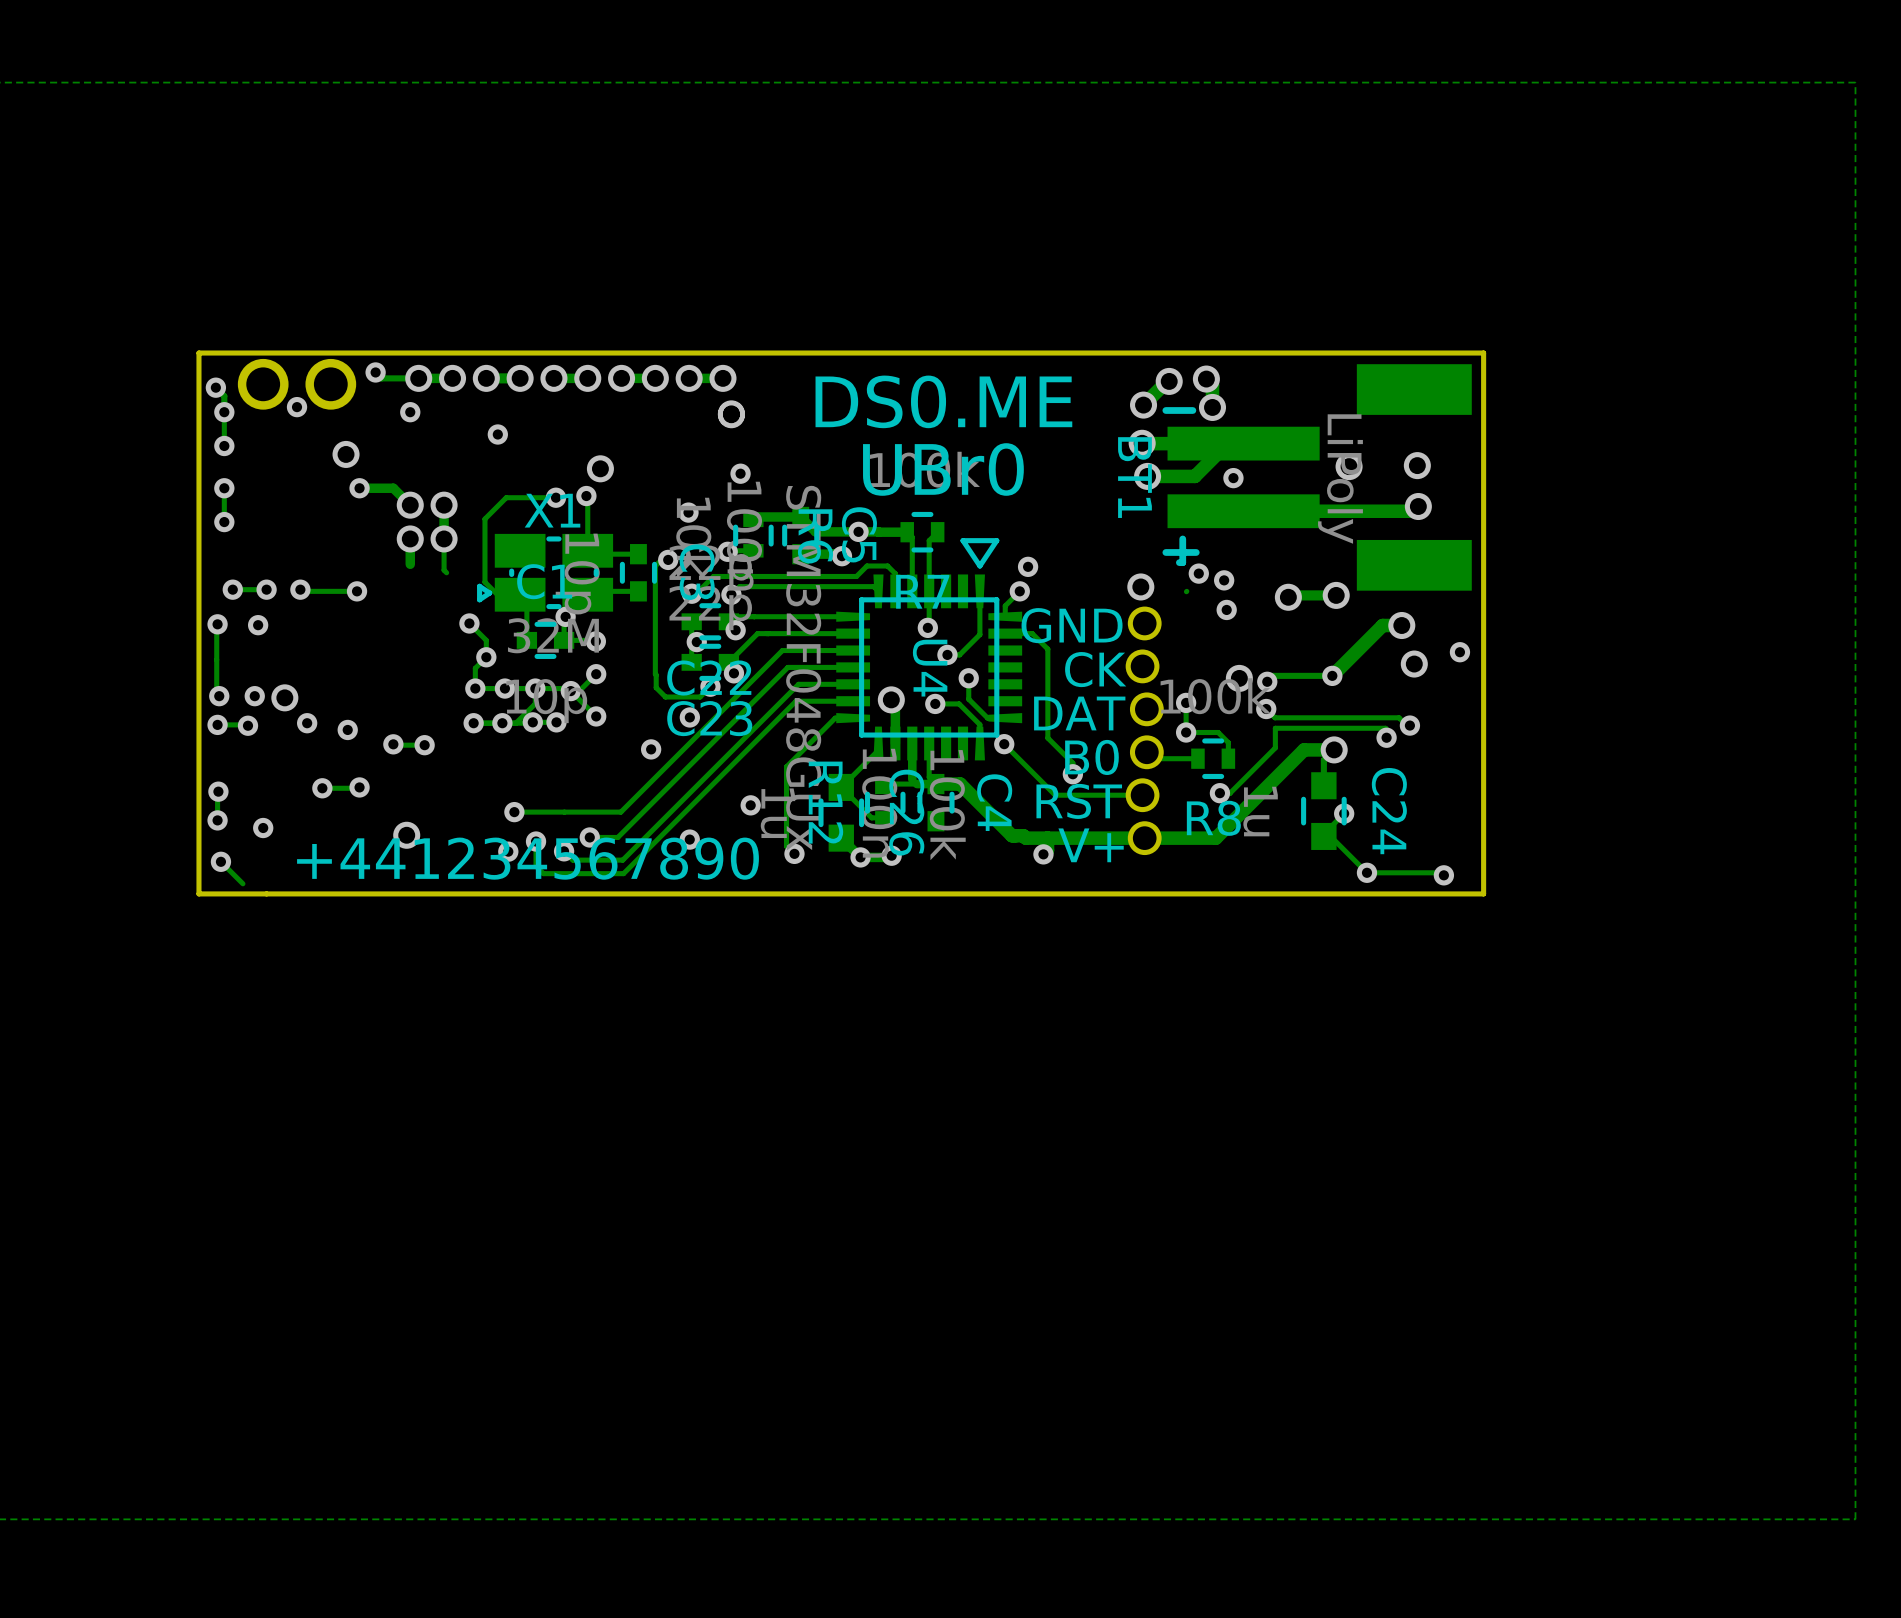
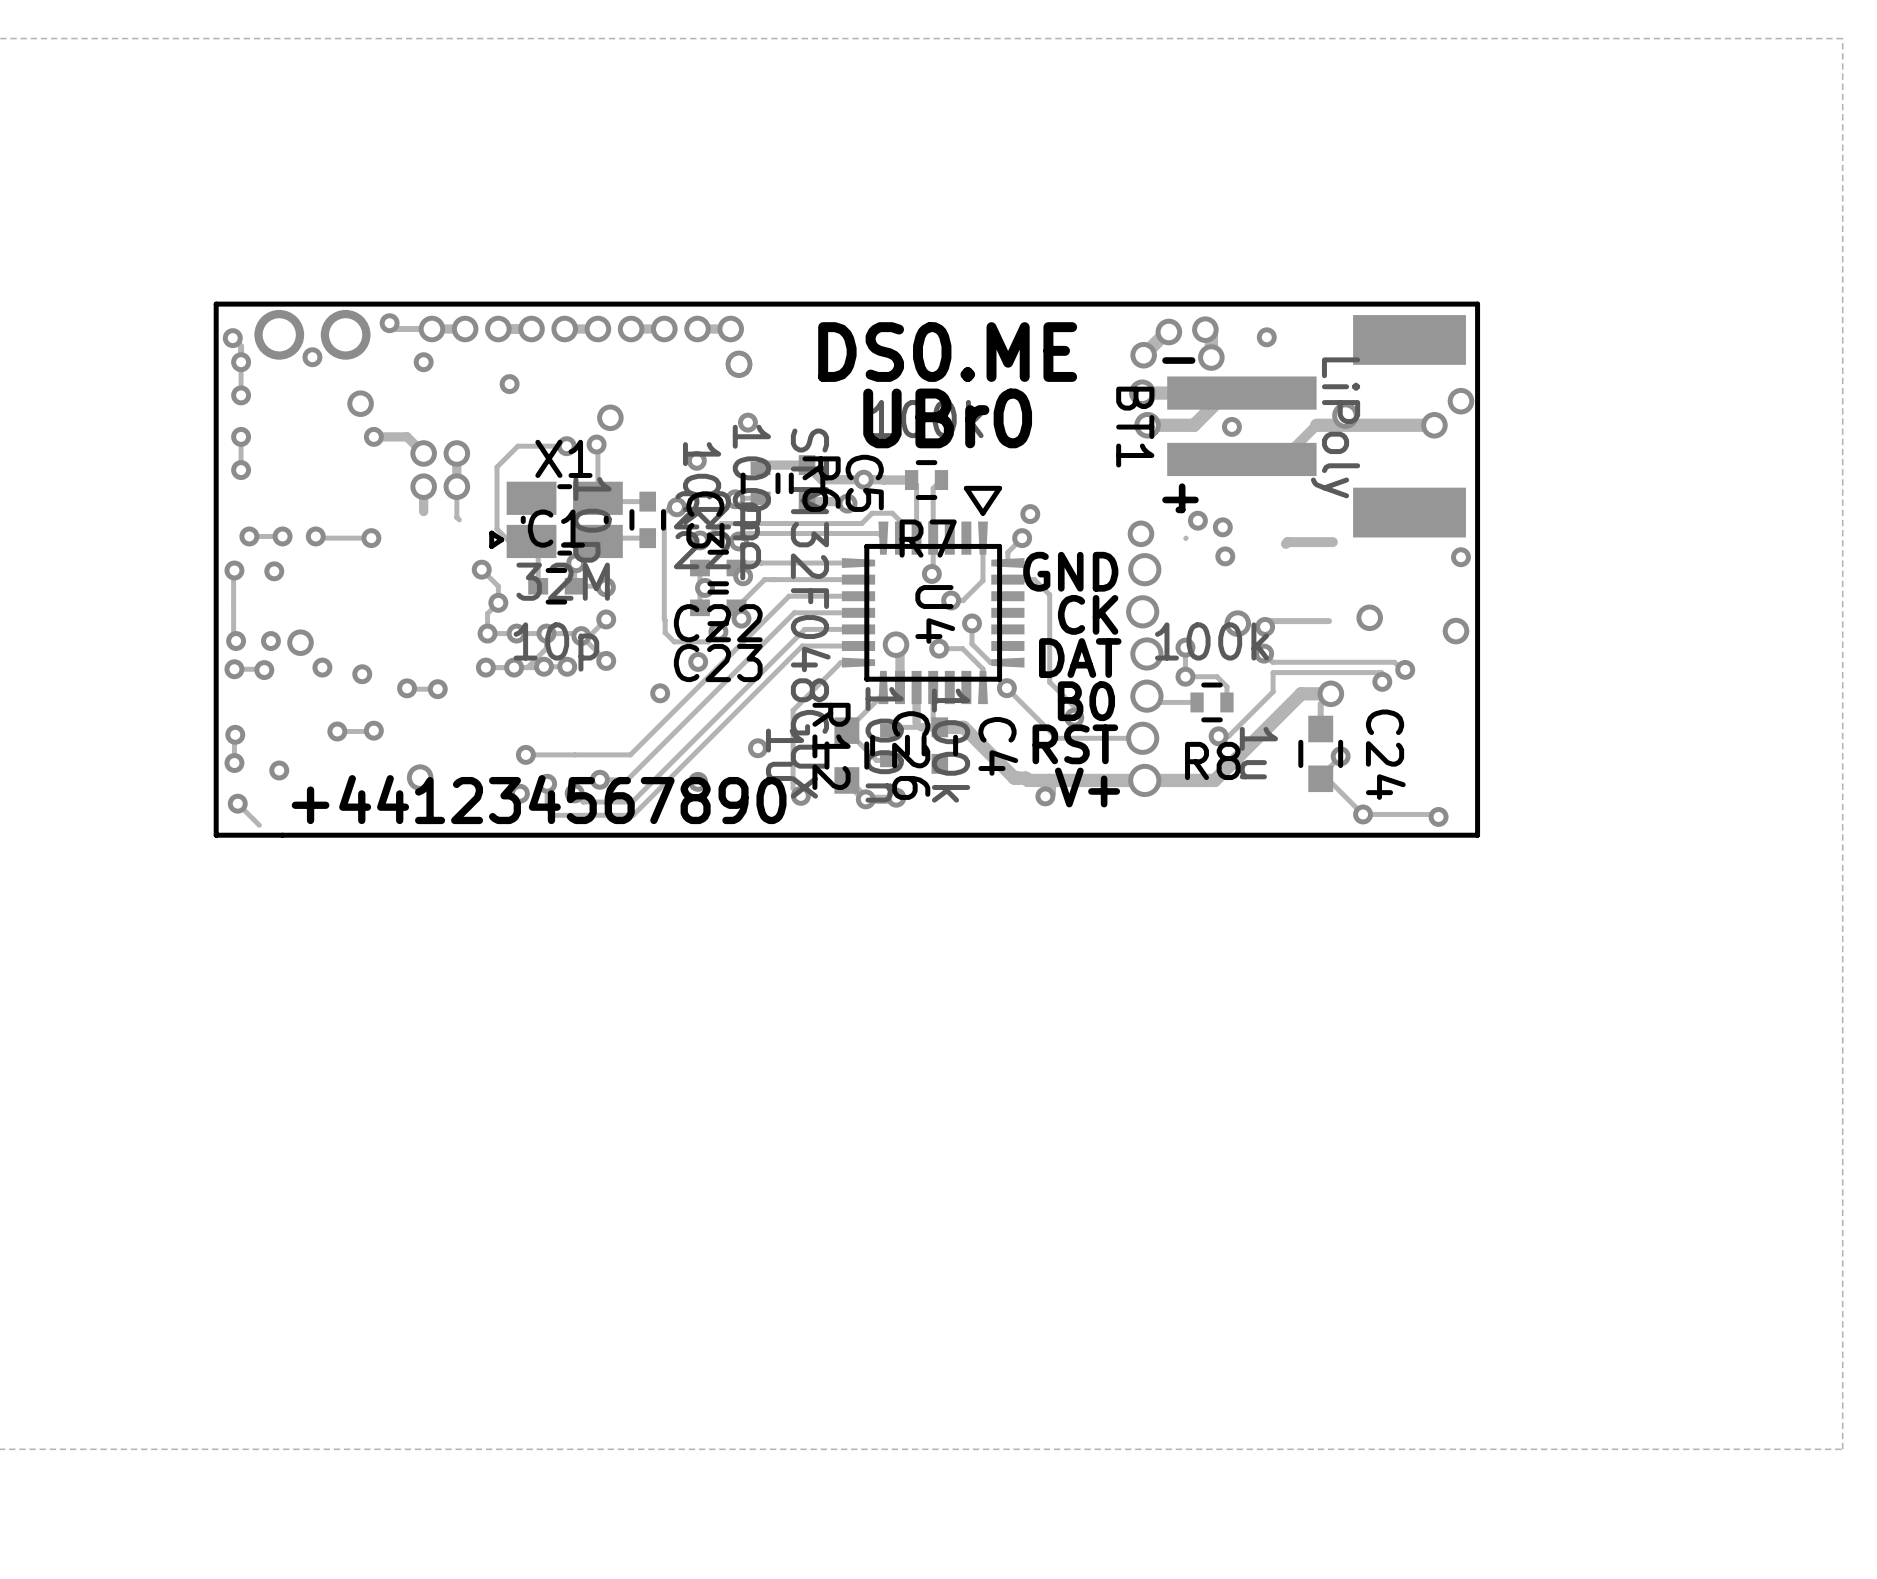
via: none -> (1266, 337)
via: none -> (1460, 401)
via position: (1417, 465) -> (1434, 425)
track: (1418, 506) (1413, 511) (1284, 511) -> (1434, 425) (1316, 425) (1282, 459)
via: (1418, 506) -> none
via: (1336, 595) -> none
via: (1288, 597) -> none
track: (1401, 625) (1382, 625) (1332, 675) -> none
via: (1401, 625) -> none
via position: (1459, 652) -> (1460, 557)
via: (1414, 664) -> none
via: none -> (1369, 617)
via: (1332, 675) -> none
via: none -> (1455, 631)

